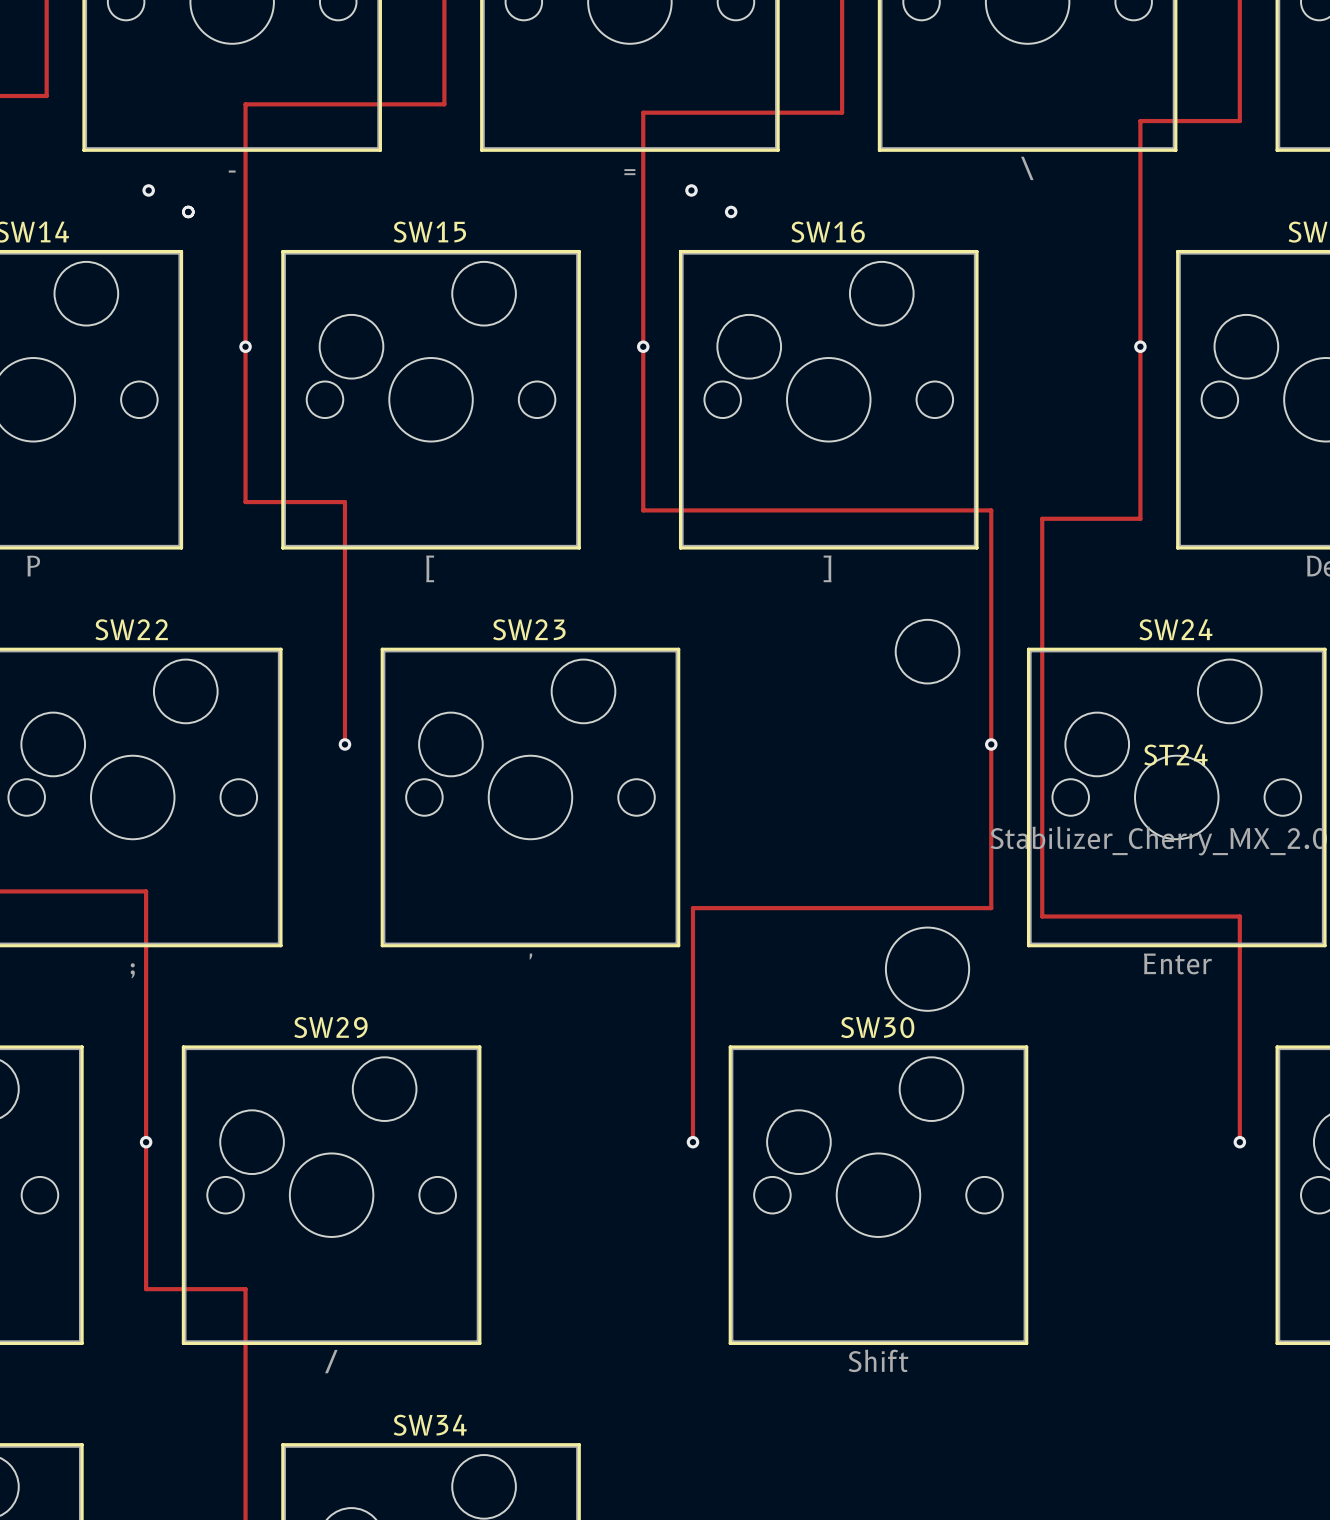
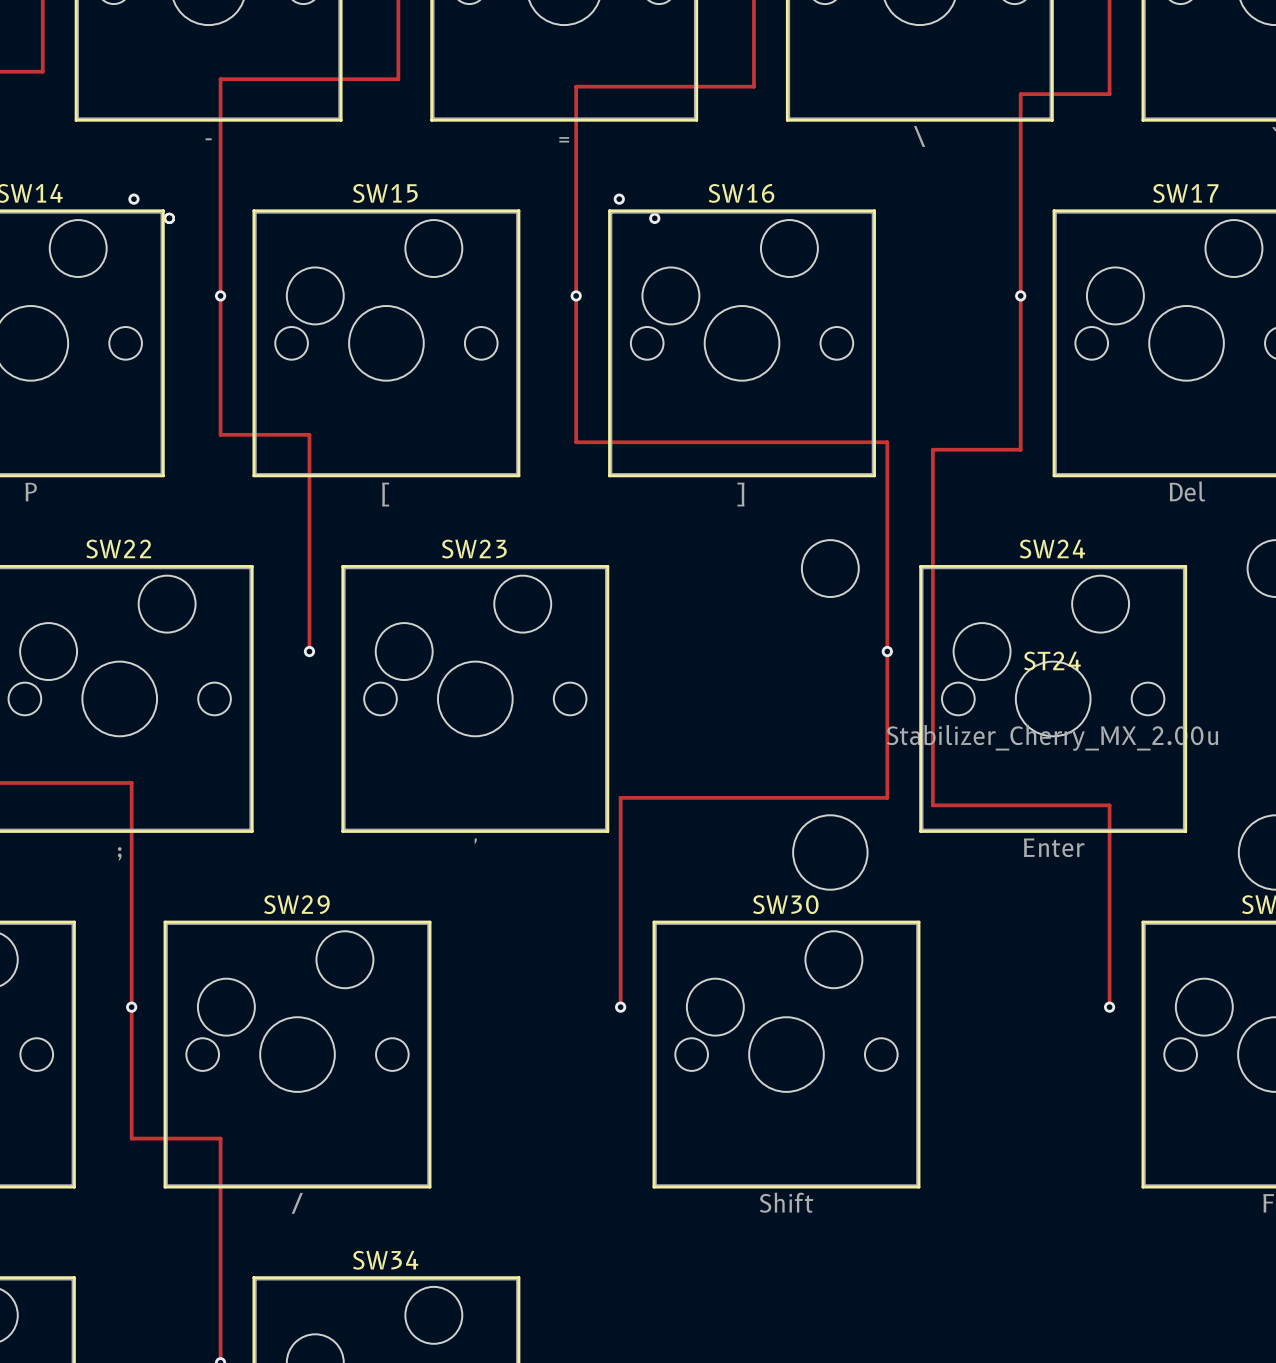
via: (148, 190) -> none
via: (691, 190) -> none
via: (188, 211) -> none
via: (731, 211) -> none
via: none -> (133, 199)
via: none -> (619, 199)
via: none -> (169, 218)
via: none -> (654, 218)

